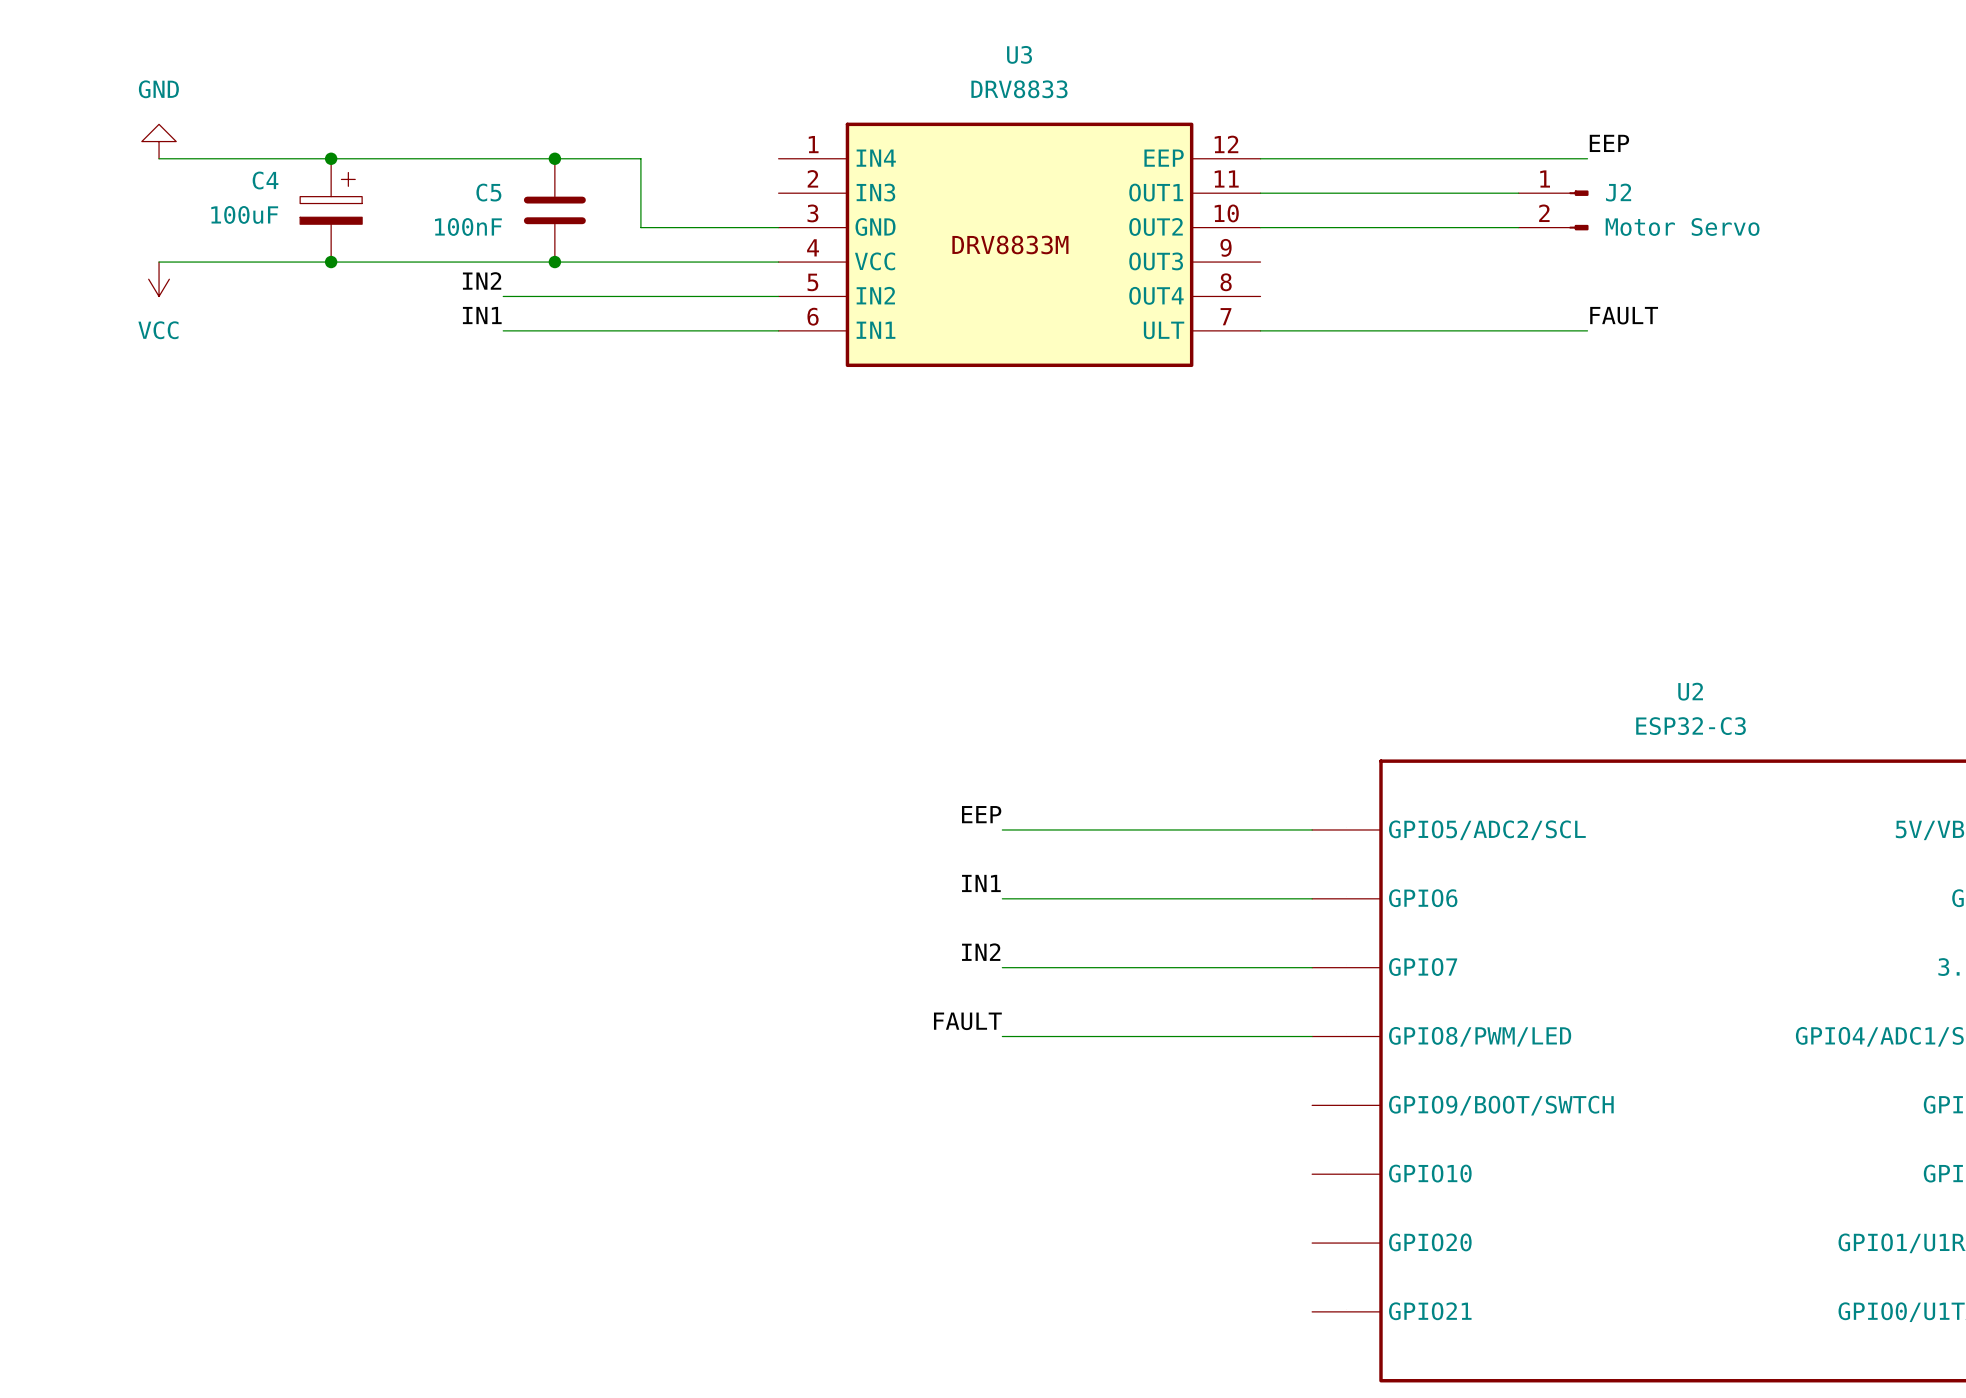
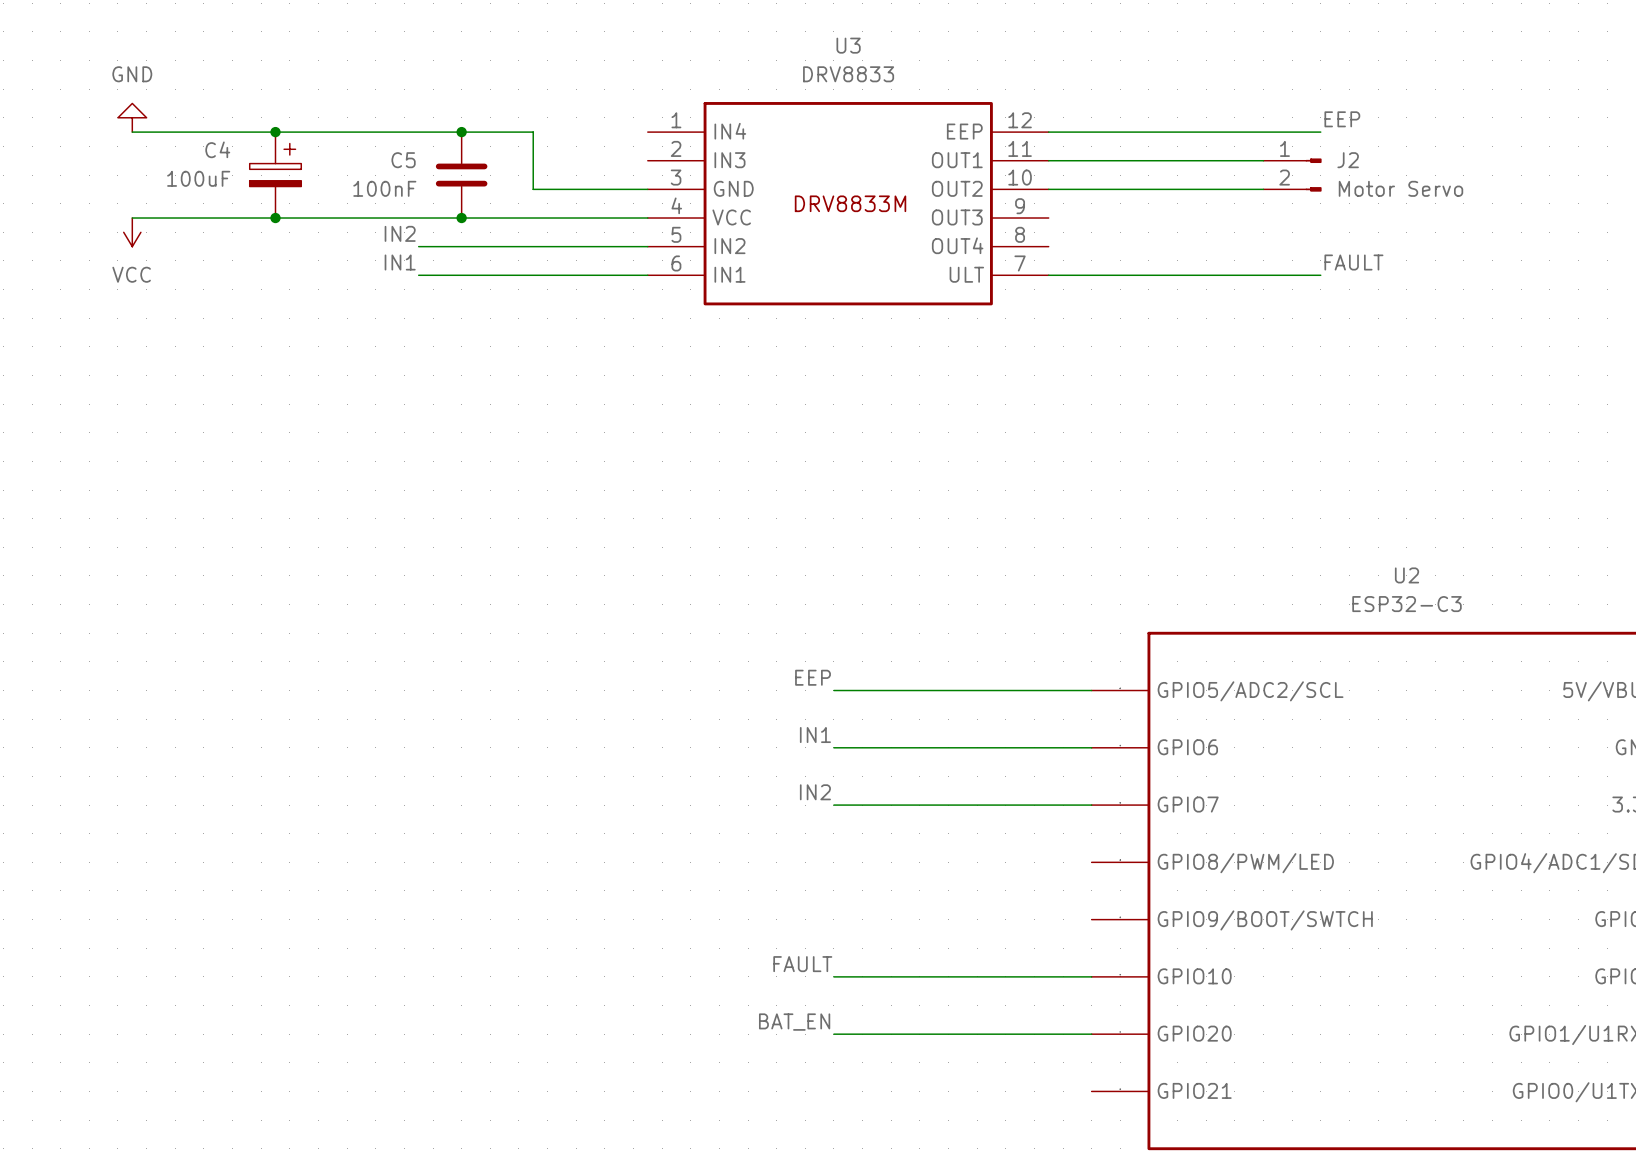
label position: FAULT (967, 1021) -> FAULT (802, 964)
wire: (1002, 1036) (1312, 1036) -> (833, 976) (1091, 976)
label: none -> BAT_EN (794, 1022)
wire: none -> (833, 1034) (1091, 1034)

